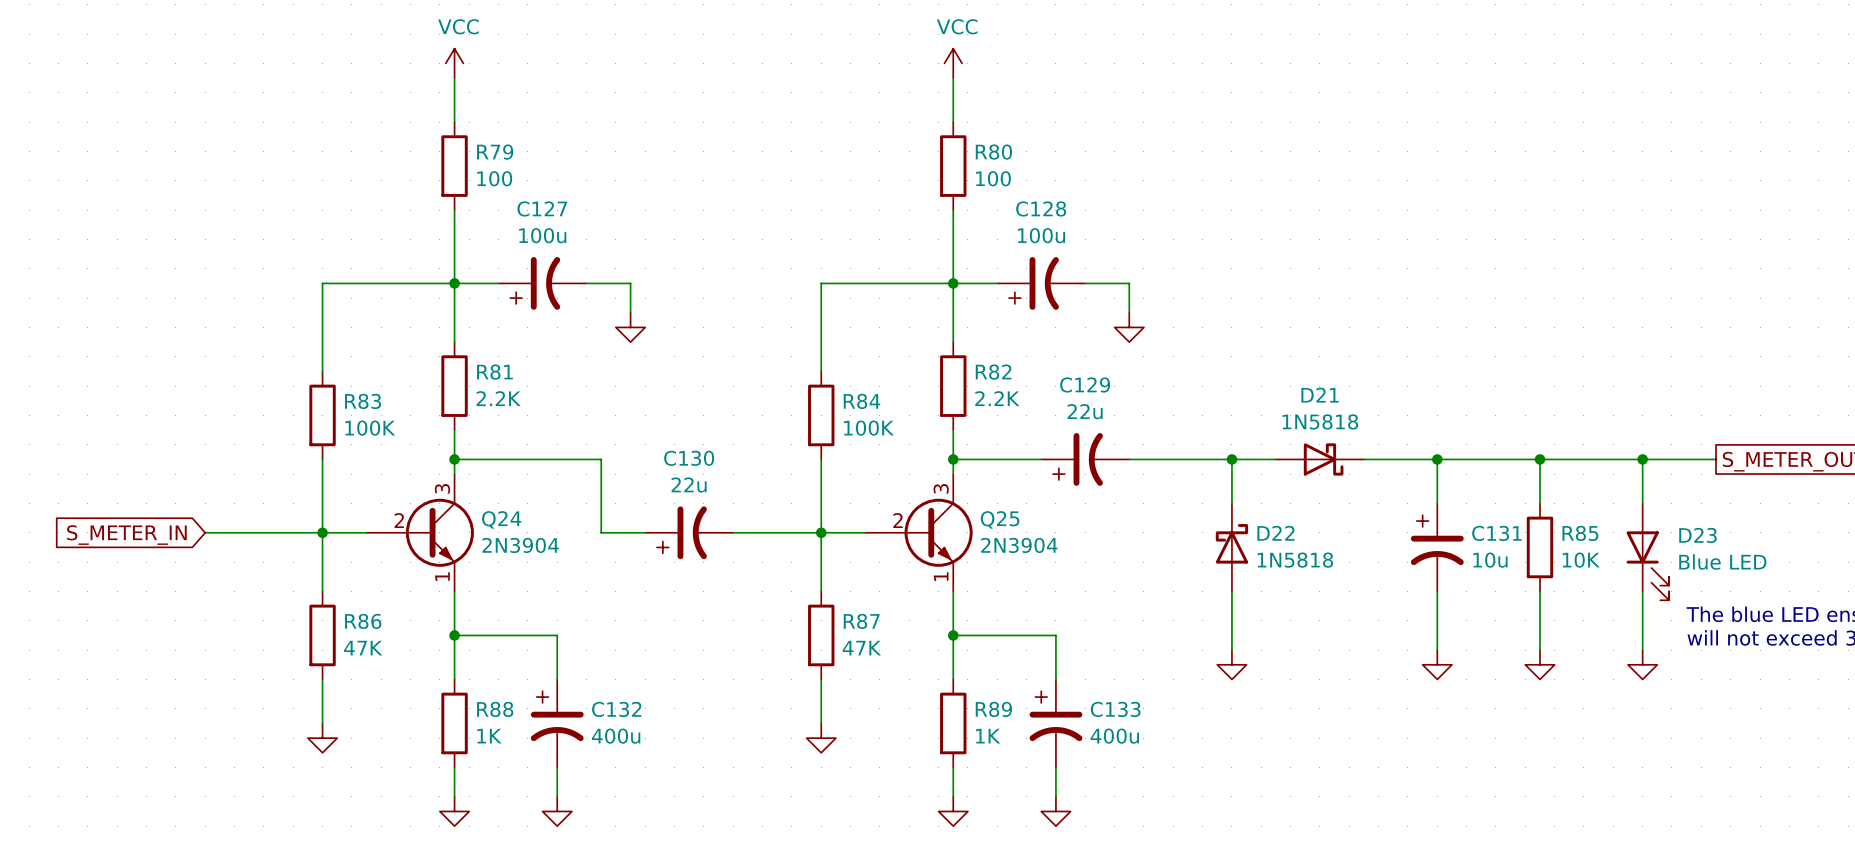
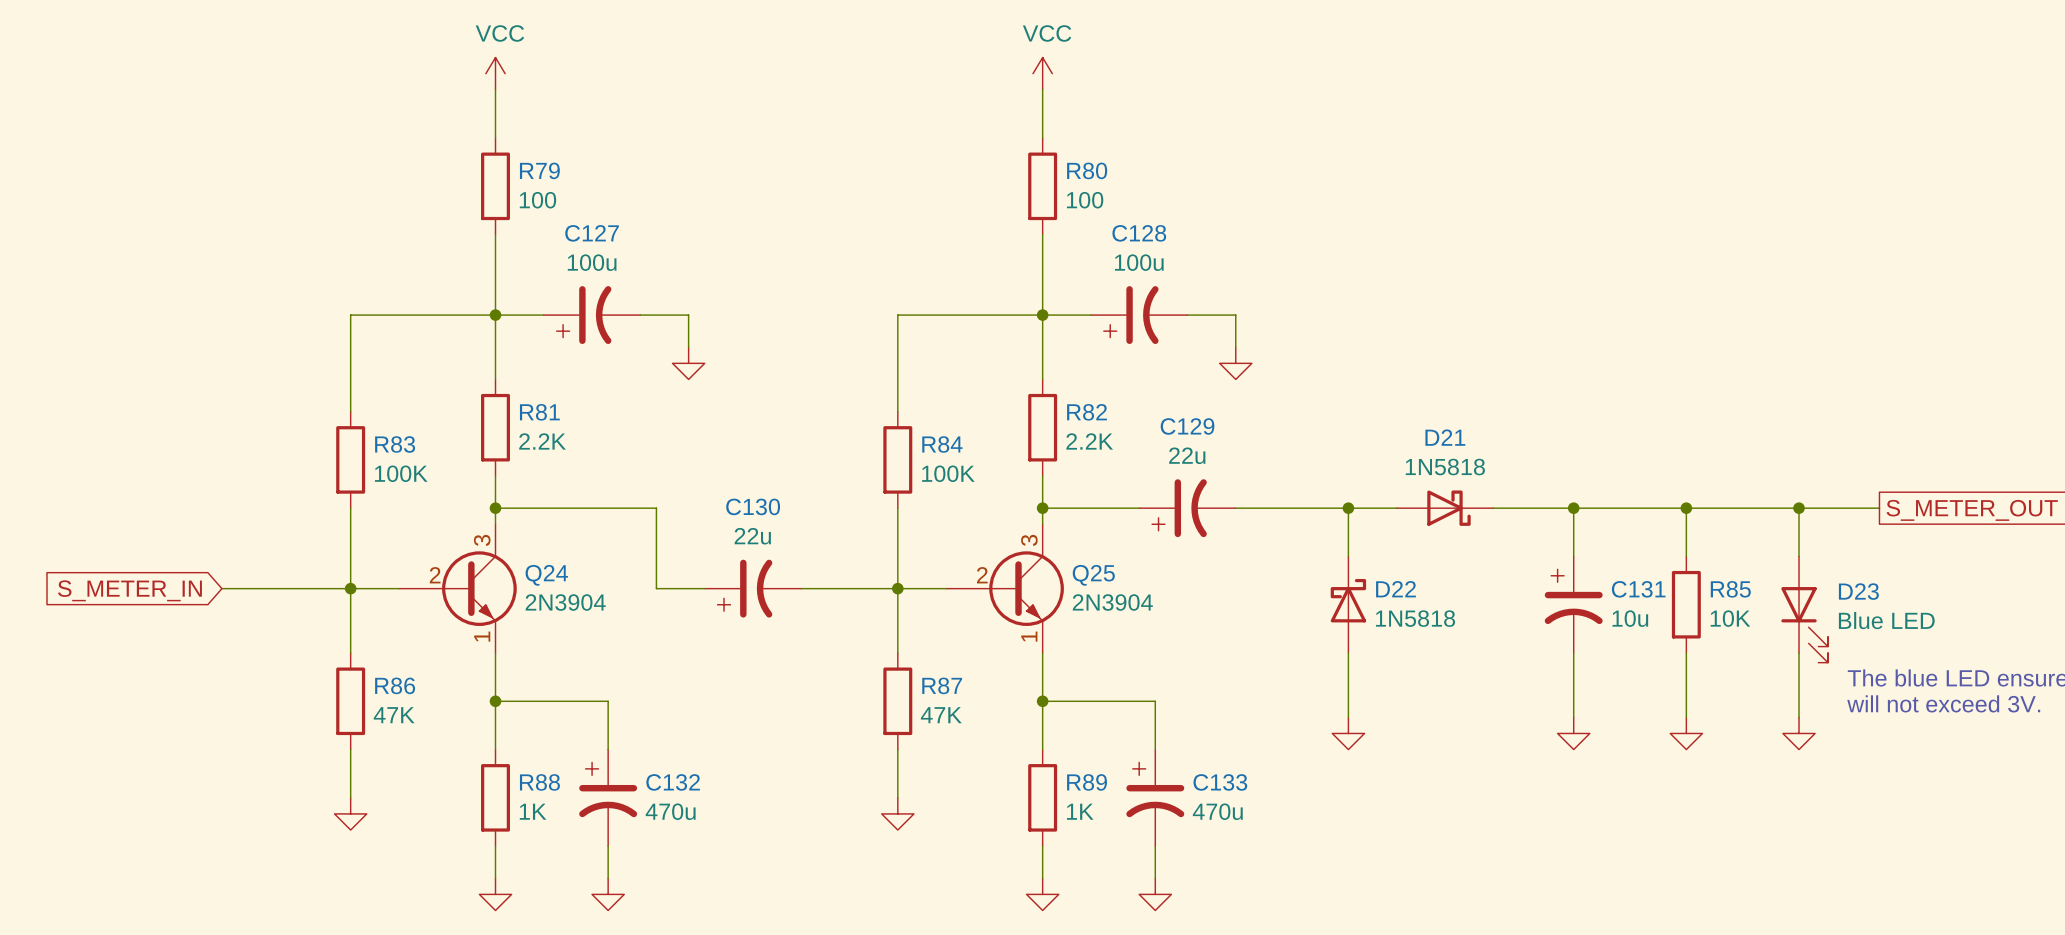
C132 value: 400u (616, 736) -> 470u (670, 811)
C133 value: 400u (1114, 736) -> 470u (1217, 811)

